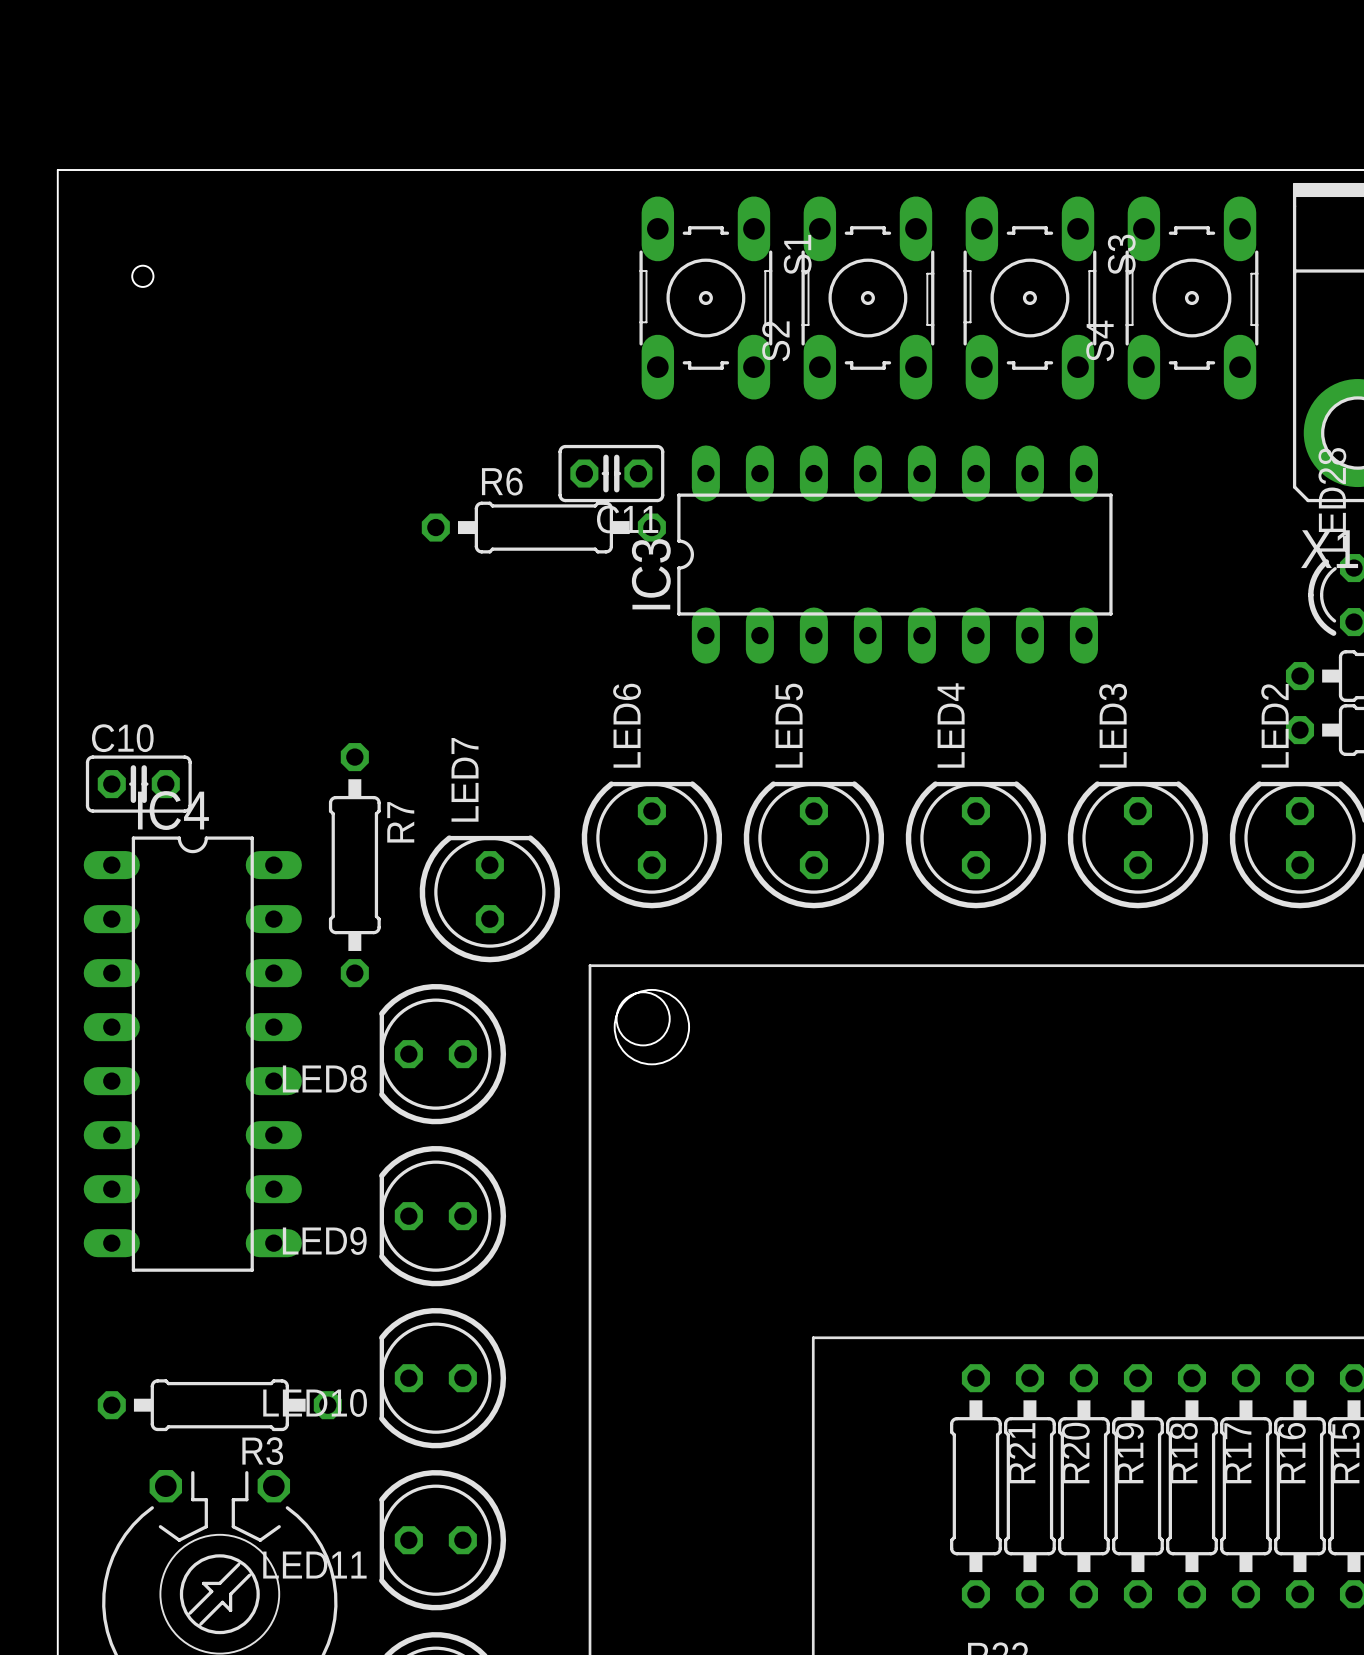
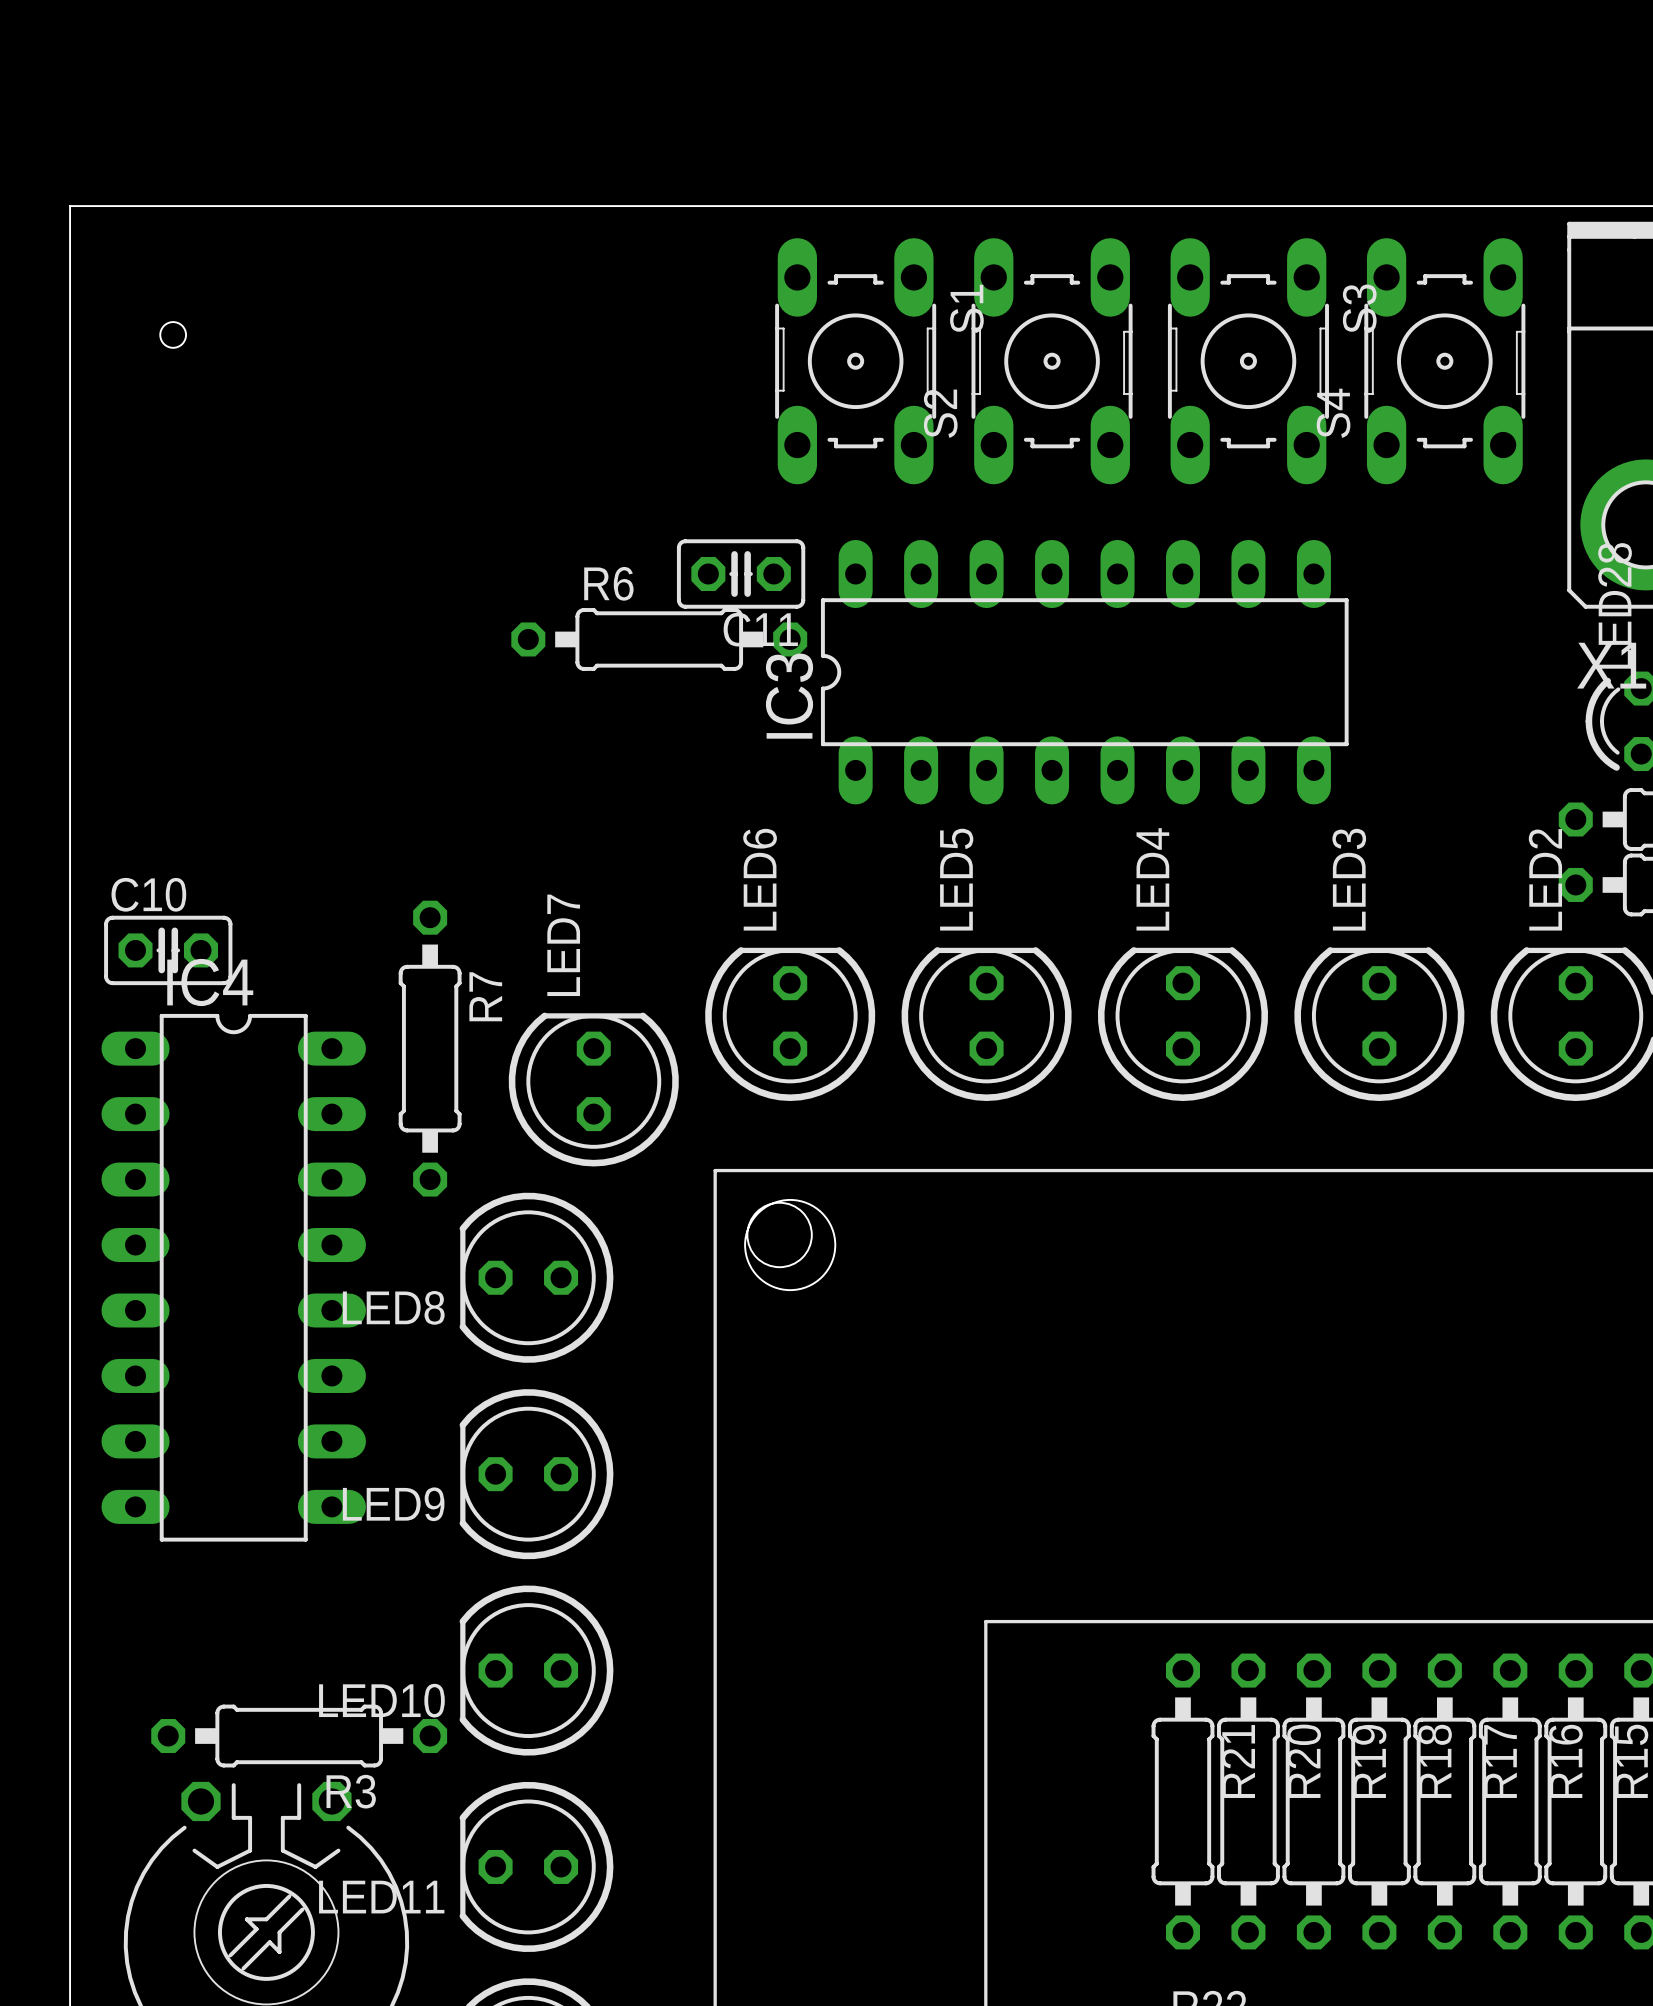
R3 position: (219, 1405) -> (299, 1736)

